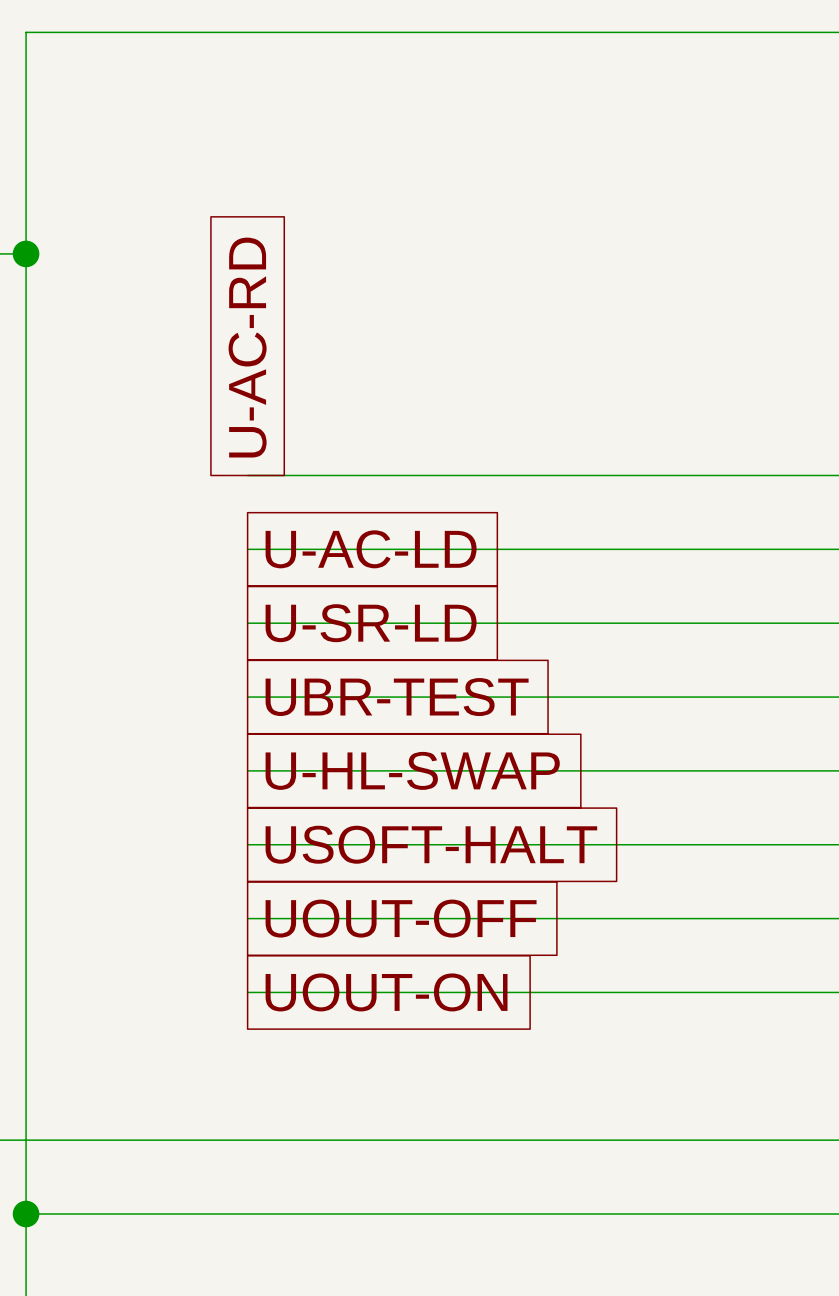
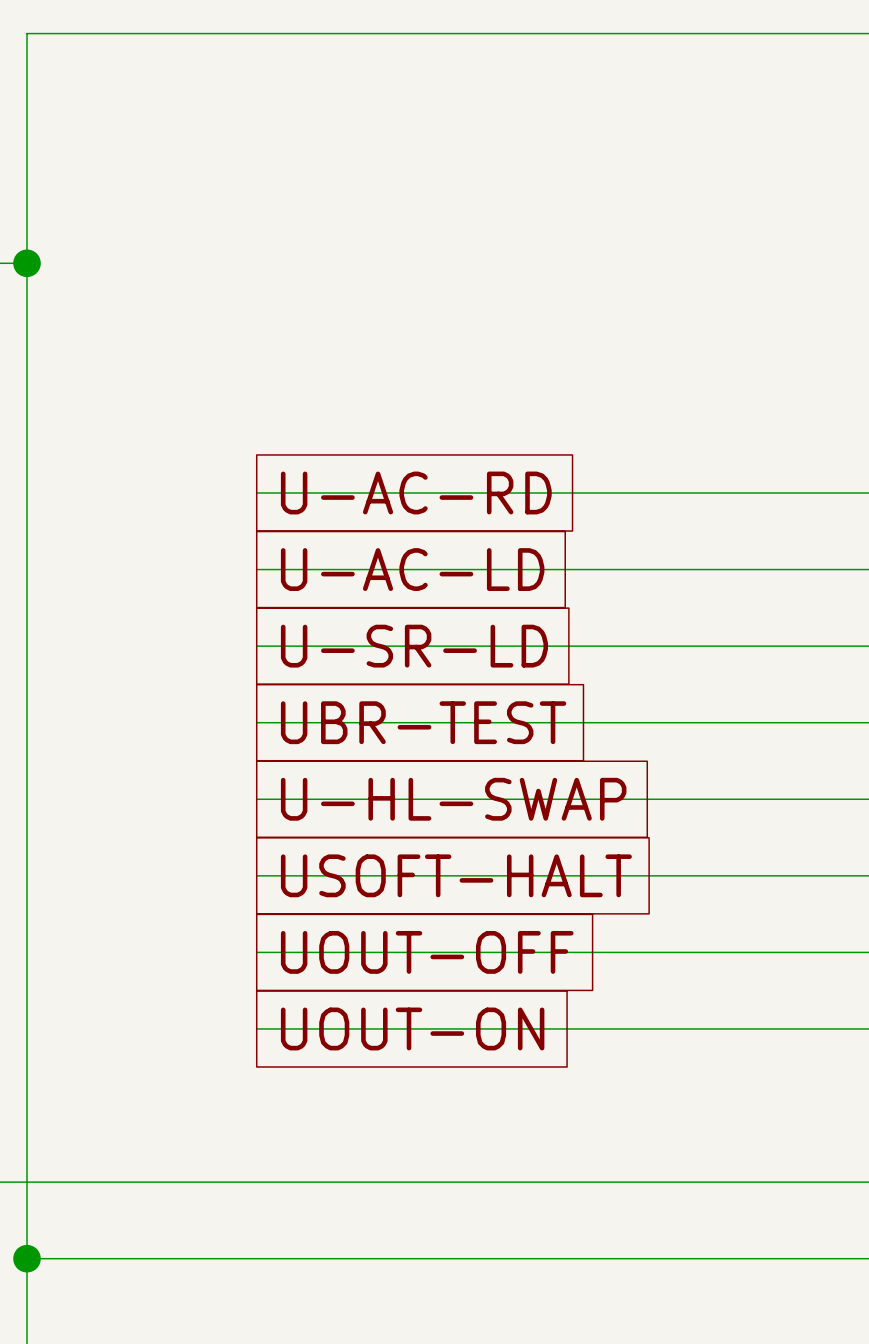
global label rotation: 0° (247, 347) -> 90° clockwise (416, 492)

